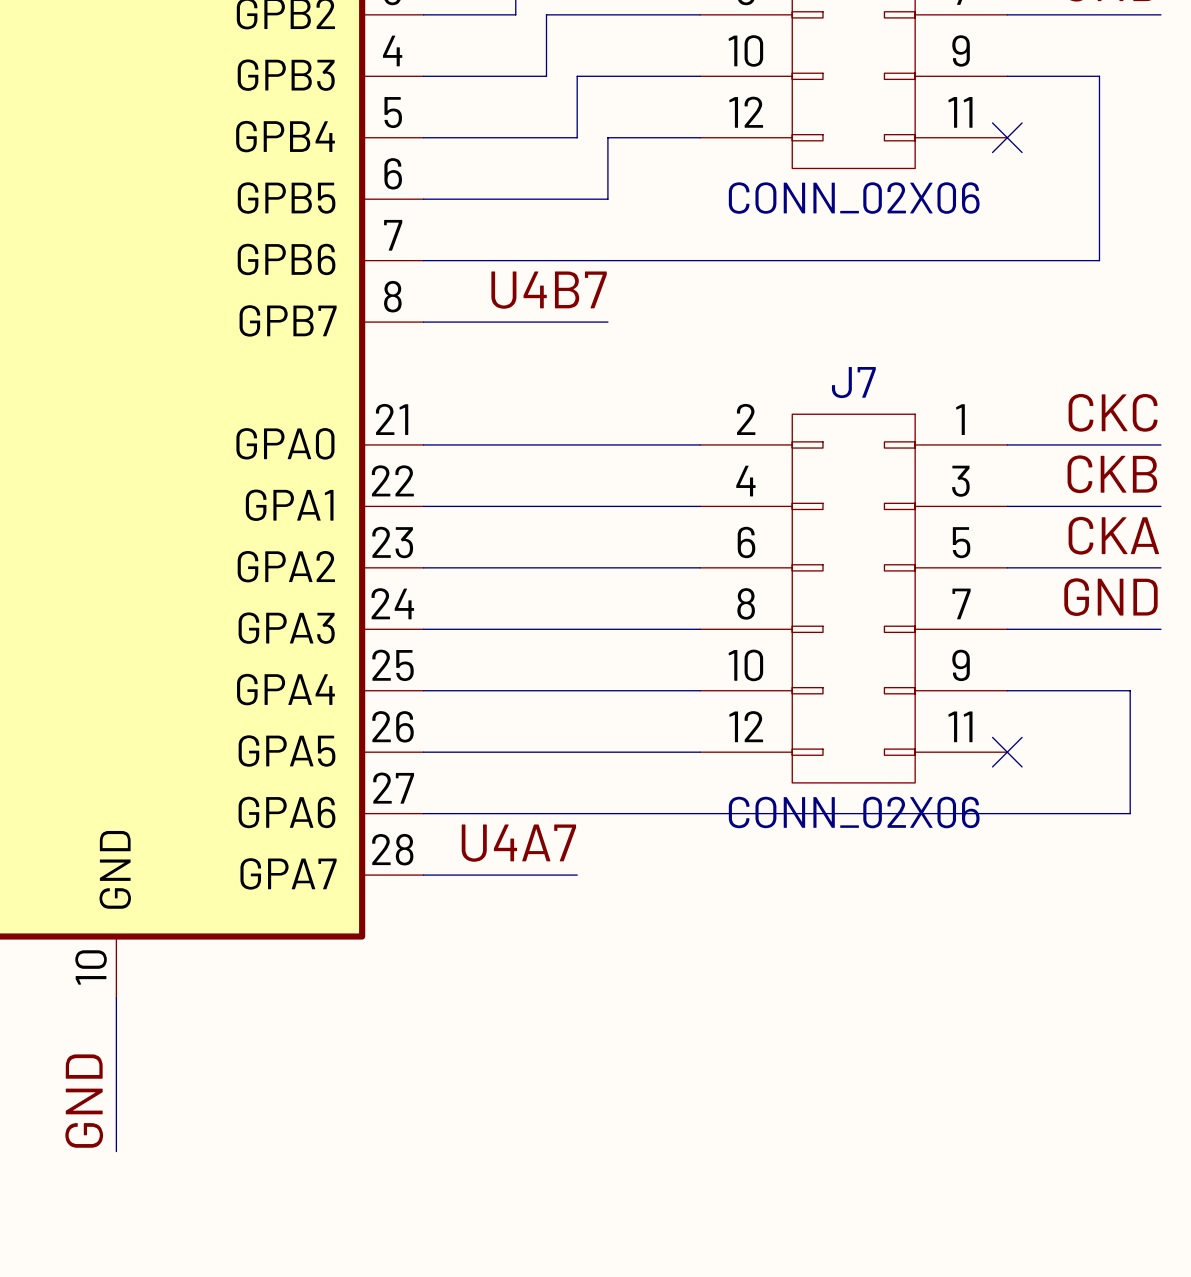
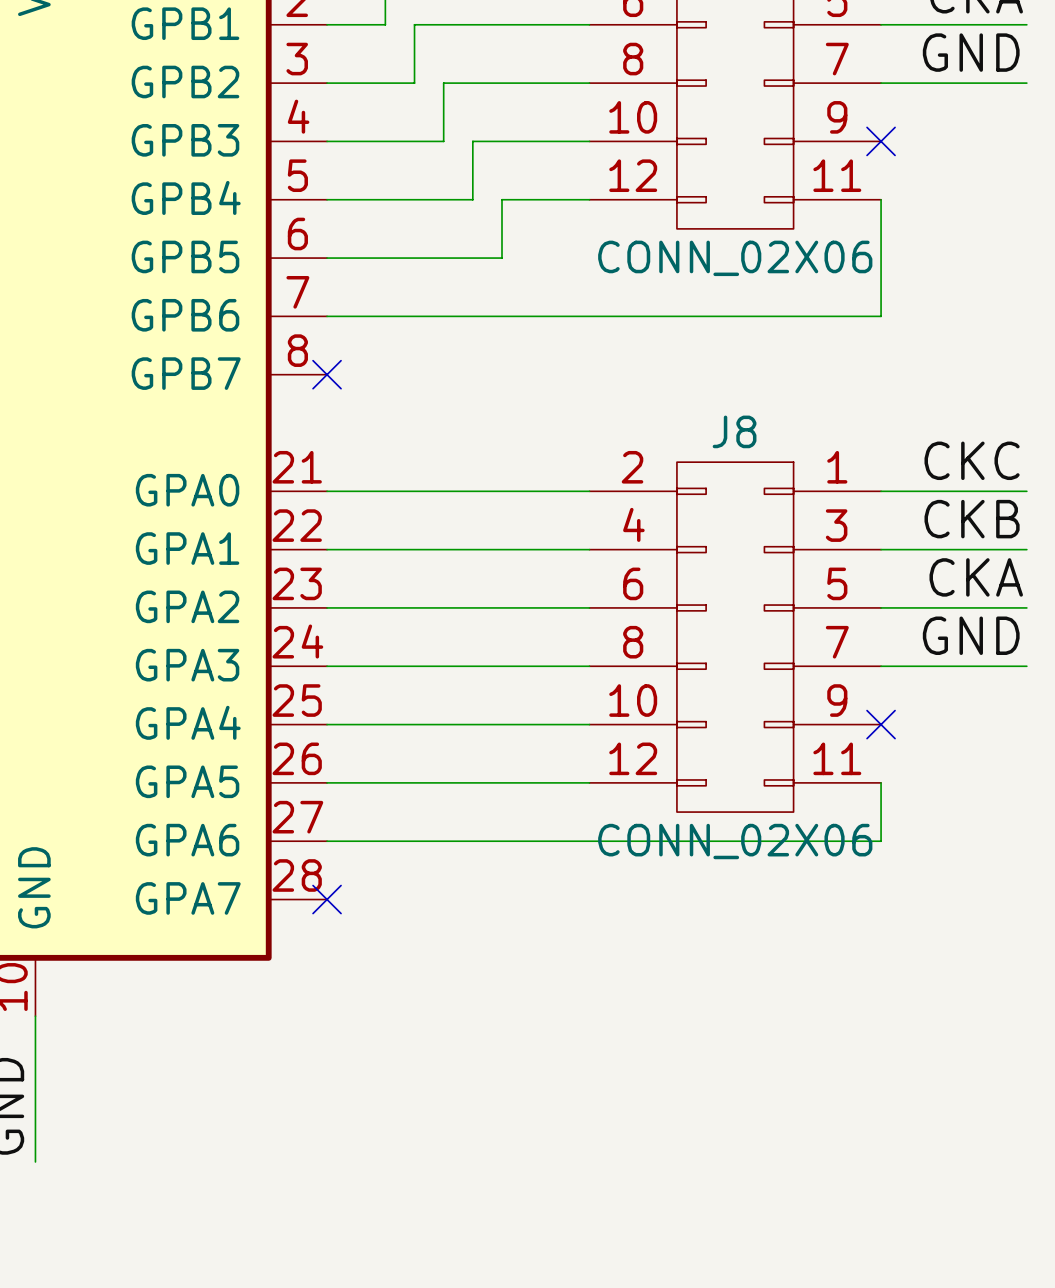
wire: (1007, 76) (1099, 76) (1099, 260) (1007, 260) -> (881, 199) (881, 316)
no-connect mark position: (1007, 137) -> (881, 141)
label: U4B7 (549, 290) -> none
wire: (423, 322) (607, 322) -> none
no-connect mark: none -> (327, 374)
J7 name: J7 (853, 382) -> J8 (734, 431)
wire: (1007, 690) (1130, 690) (1130, 813) (1007, 813) -> (881, 782) (881, 841)
no-connect mark position: (1007, 752) -> (881, 724)
label: U4A7 (518, 843) -> none
wire: (423, 875) (577, 875) -> none
no-connect mark: none -> (327, 899)

